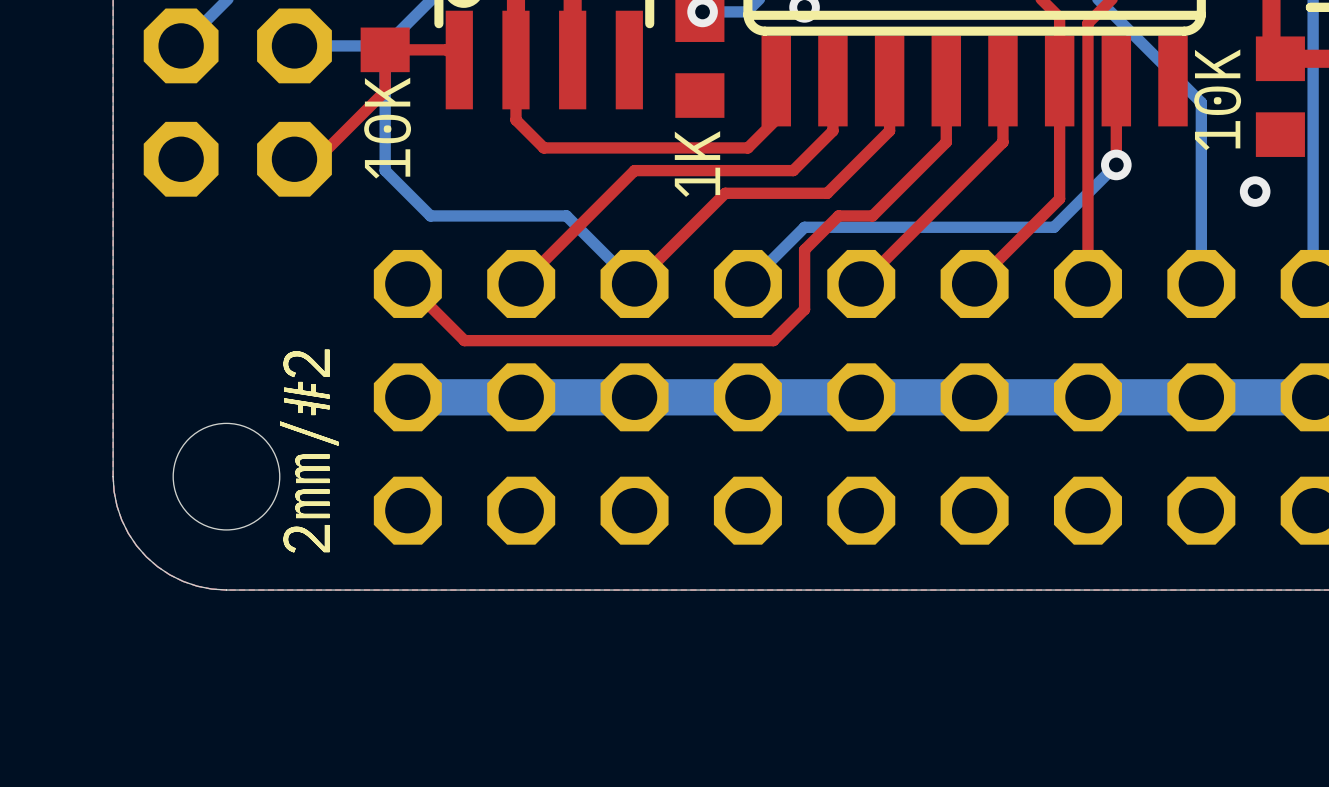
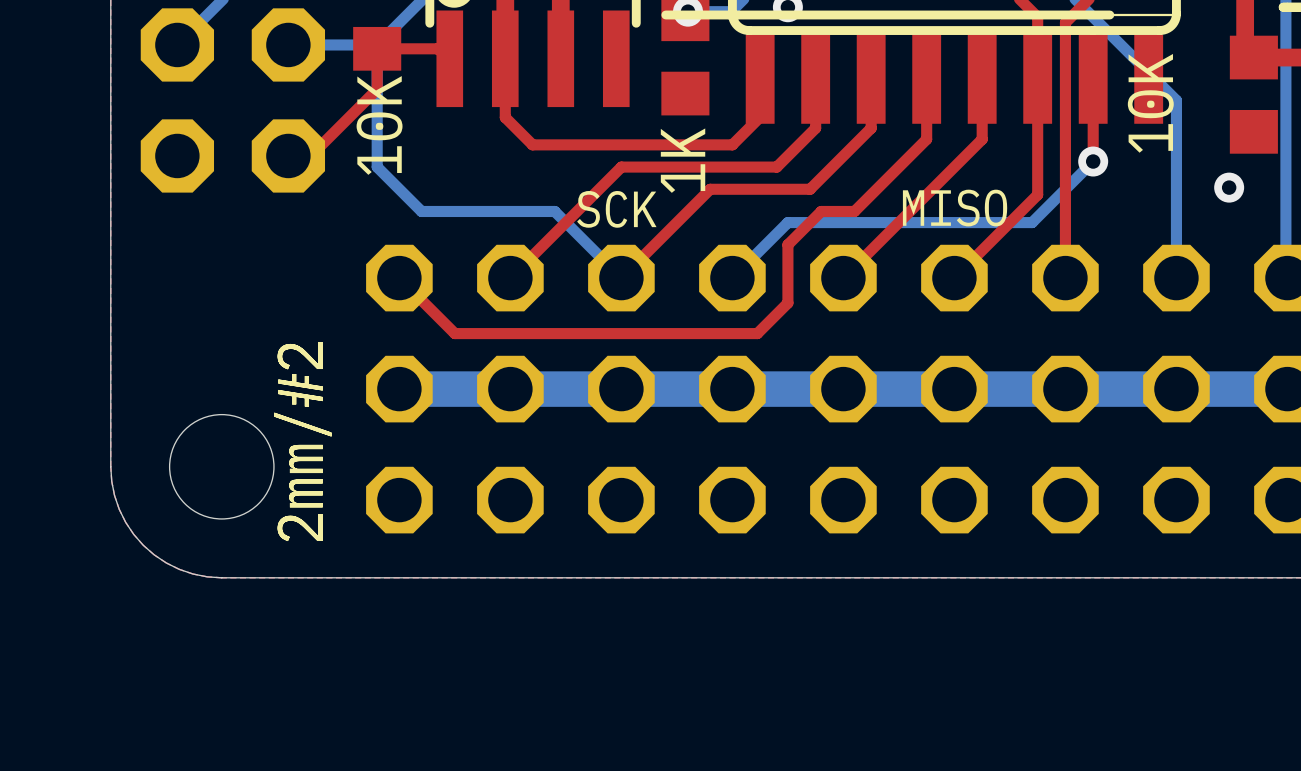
line: (1133, 15) (1201, 15) -> (665, 14) (732, 14)
text position: 10K (1217, 99) -> 10K (1150, 103)
text: none -> MISO (955, 208)
text: none -> SCK (616, 209)

